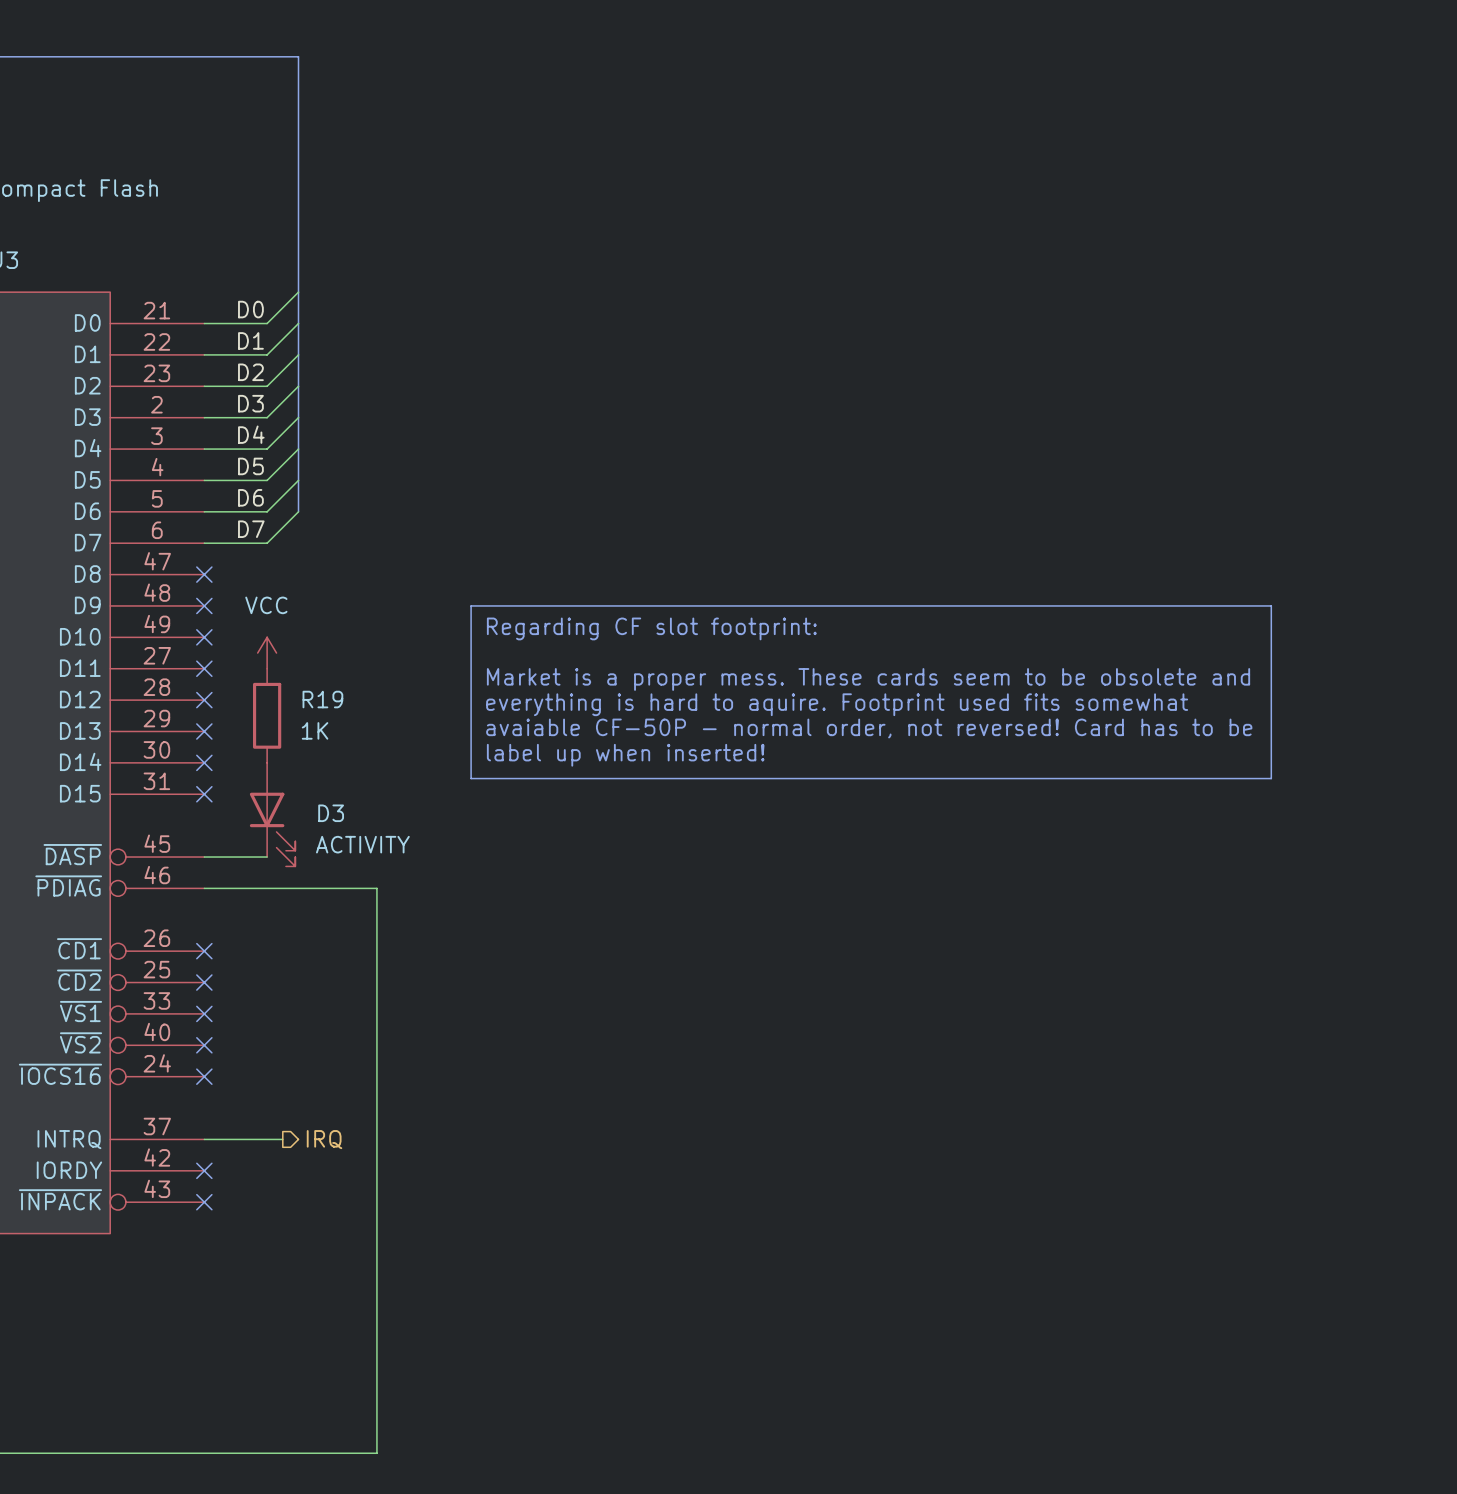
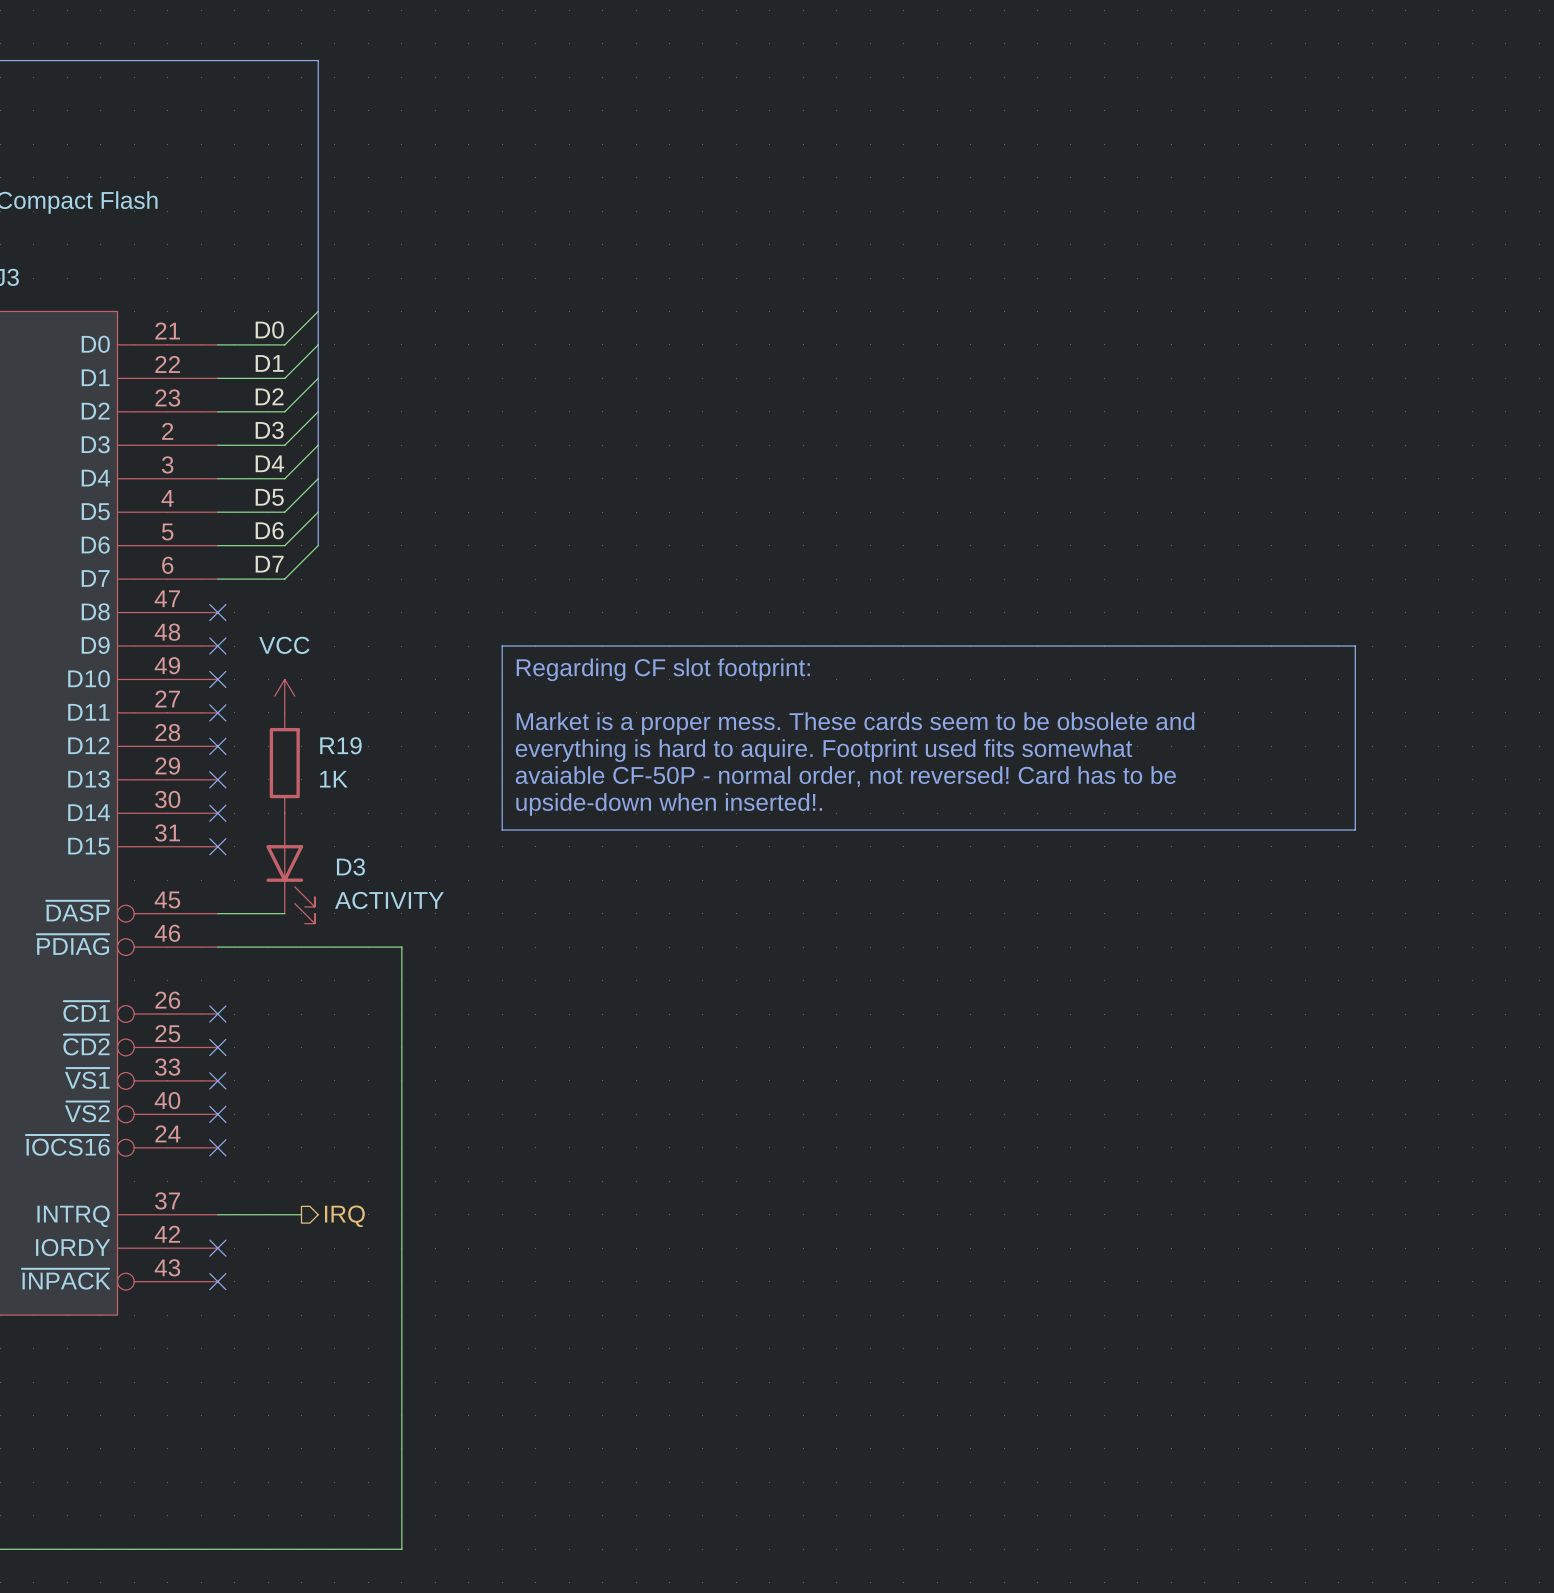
text: label up when inserted! (625, 755) -> upside-down when inserted!. (669, 804)

